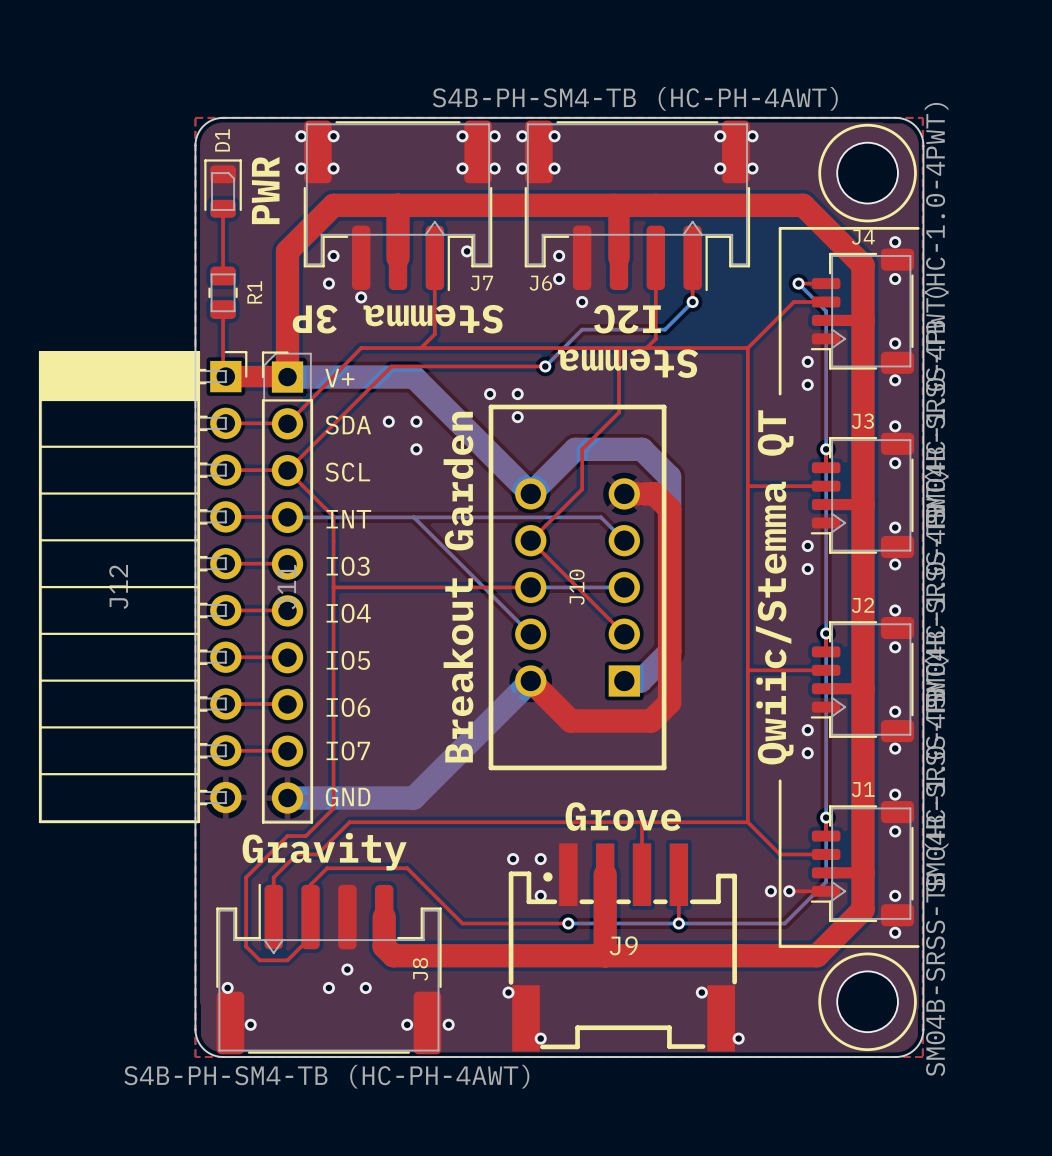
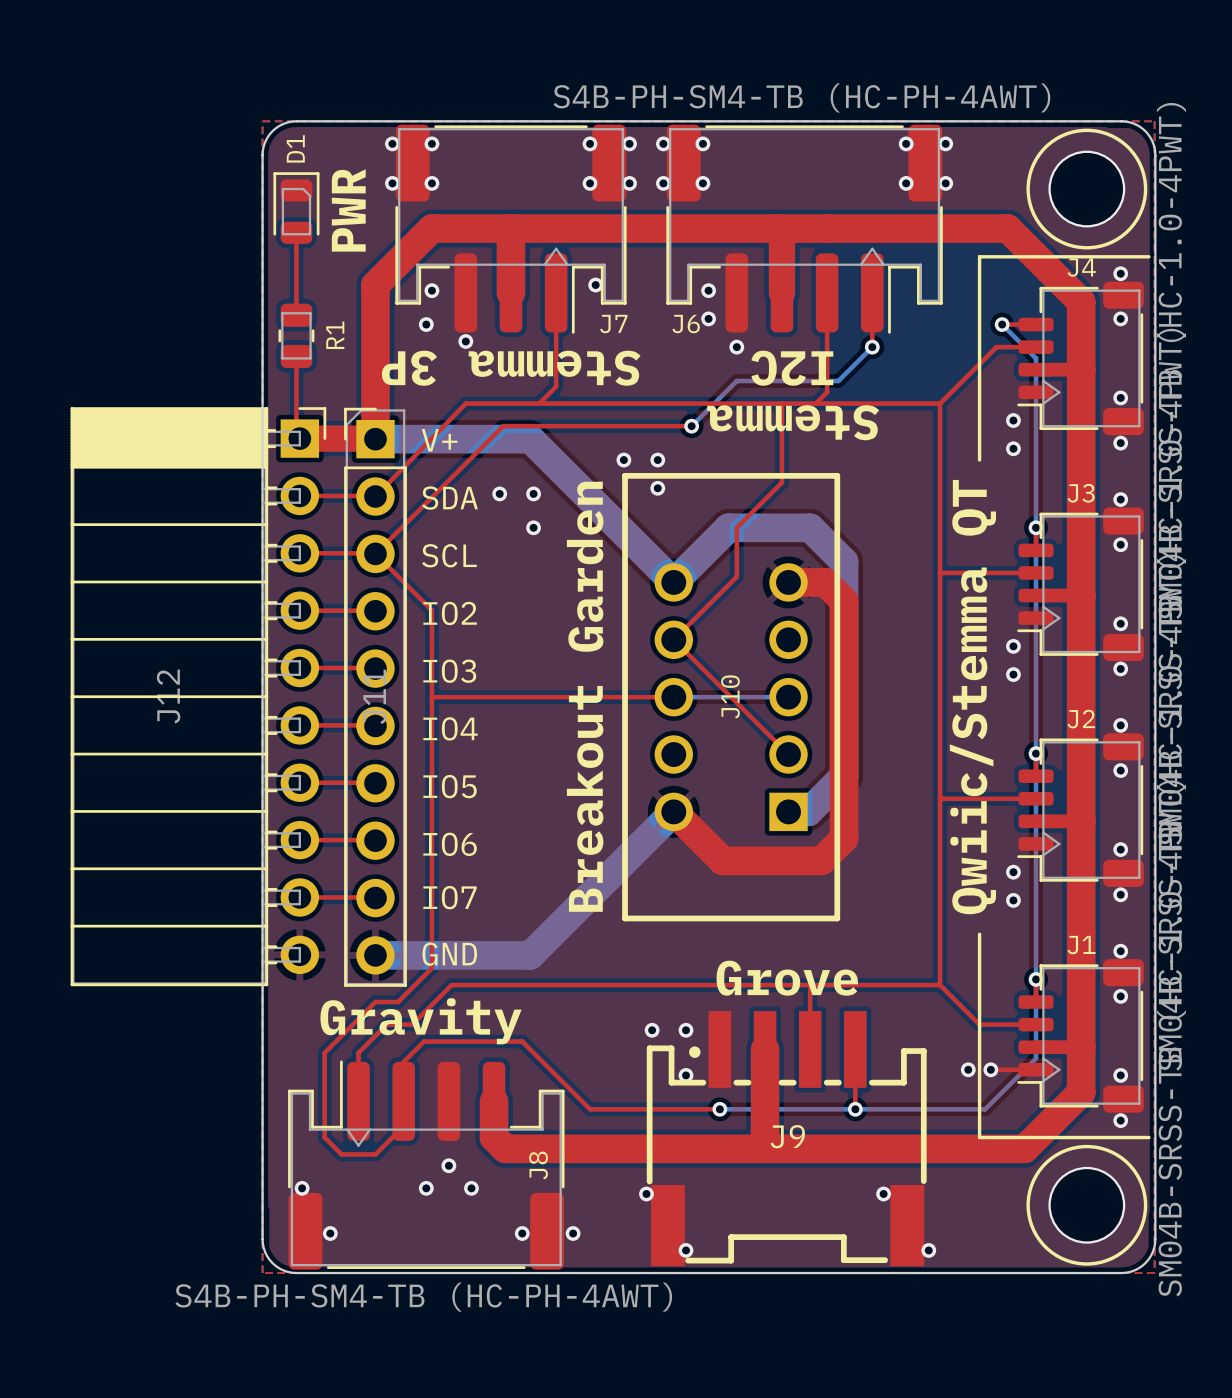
bottom track: (287, 517) (601, 517) (624, 540) -> none
bottom track: (413, 517) (530, 634) -> none
text: INT (348, 519) -> IO2 (450, 613)

